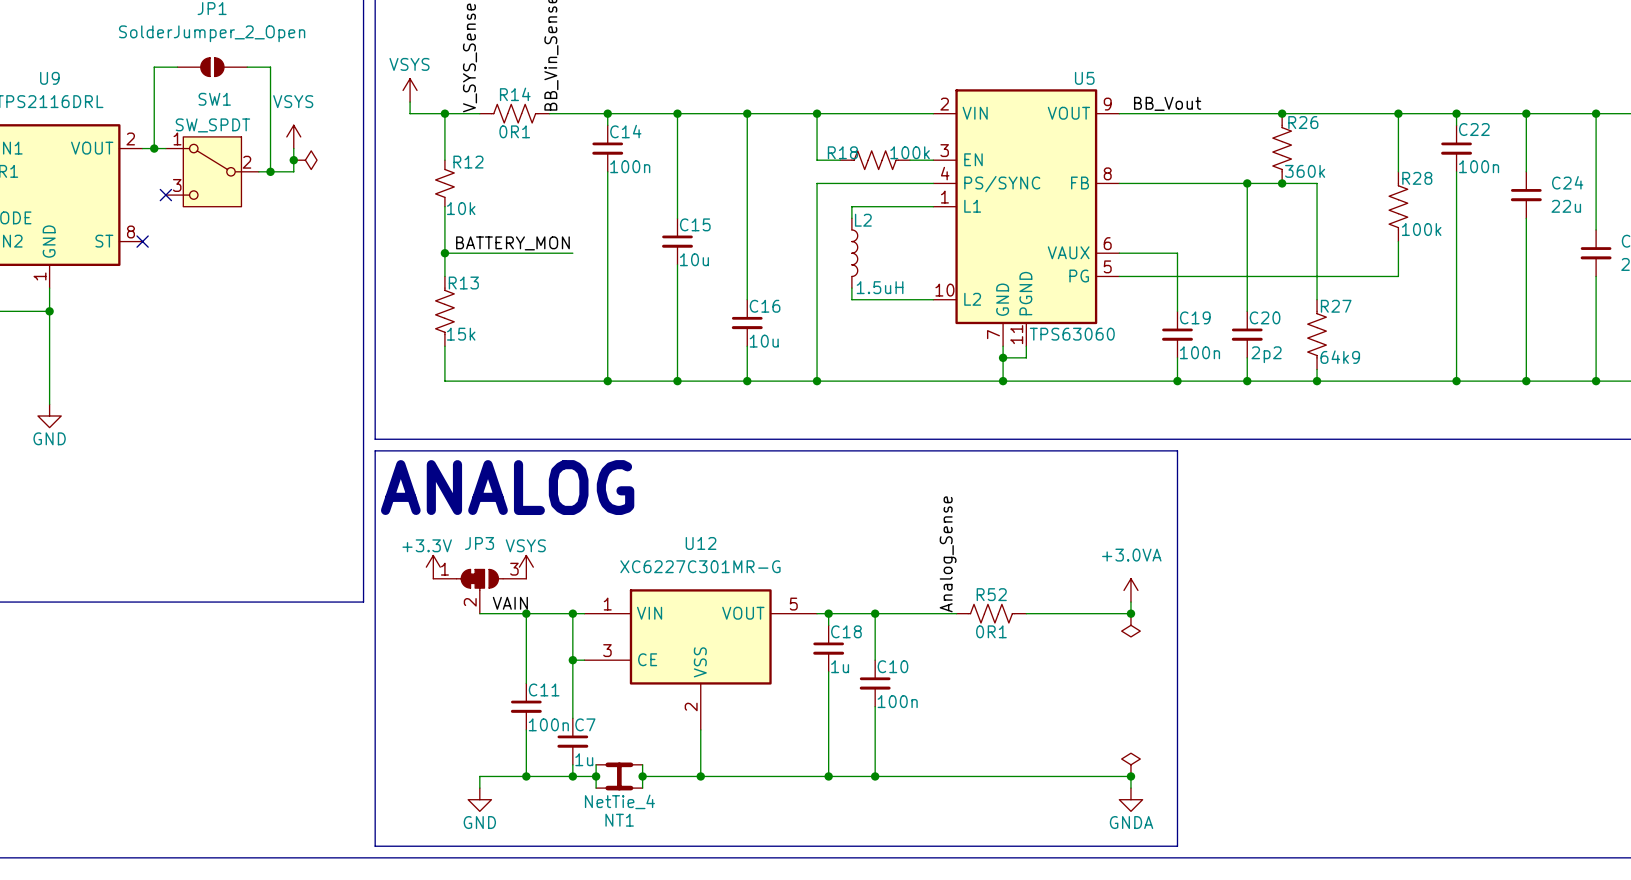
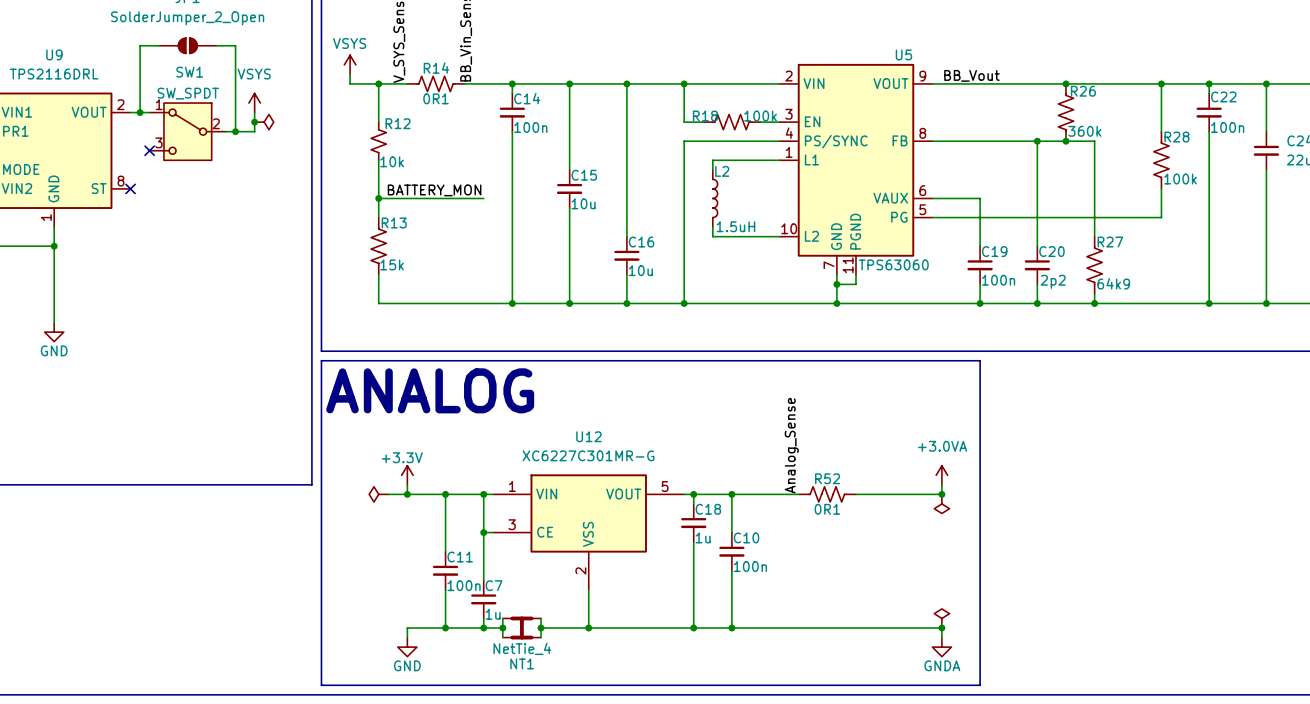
power symbol position: +3.3V (433, 567) -> +3.3V (407, 475)
power symbol: VSYS (526, 567) -> none
JP3: (479, 591) -> none
wire: none -> (407, 484) (407, 494) (388, 494)
label: VAIN (510, 603) -> none
power symbol: none -> (378, 494)
junction: none -> (407, 494)

